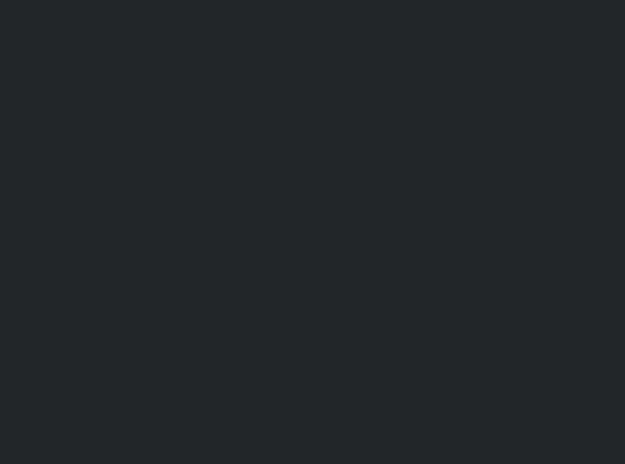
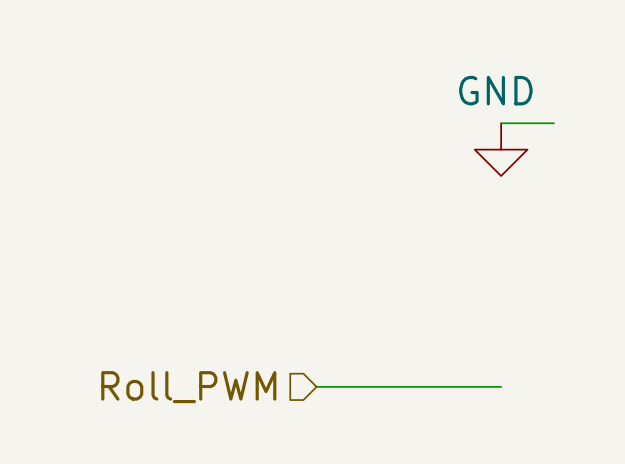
wire: none -> (501, 123) (553, 123)
power symbol: none -> GND (501, 149)
wire: none -> (316, 386) (501, 386)
hierarchical label: none -> Roll_PWM (188, 387)

